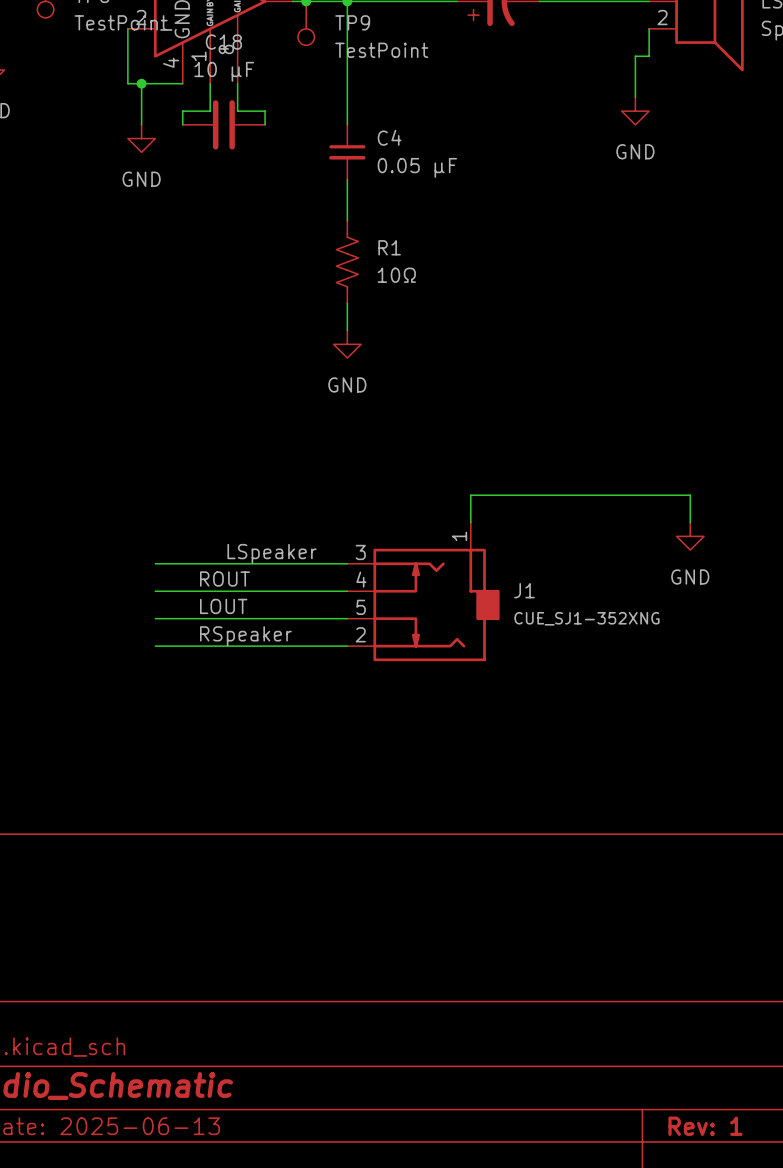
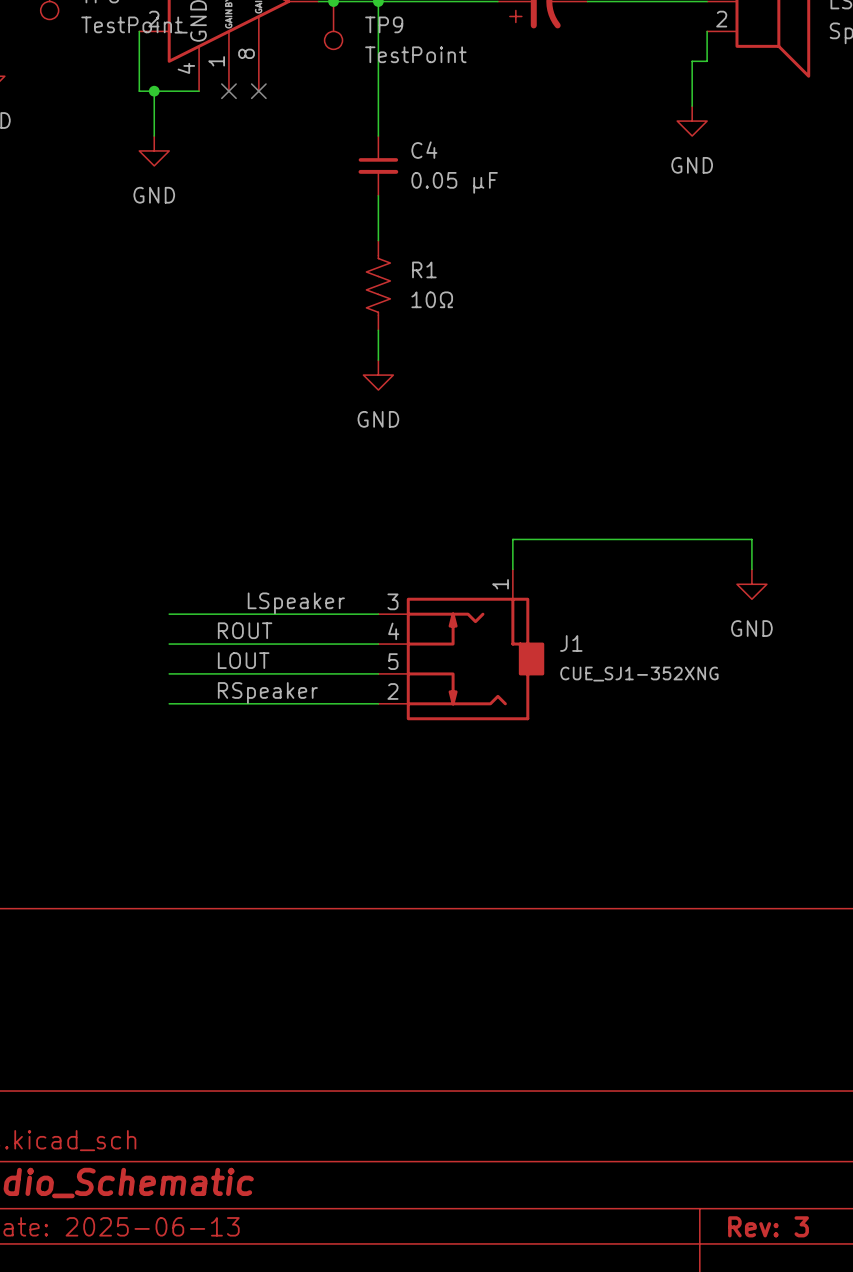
wire: (210, 83) (210, 111) (182, 111) (182, 124) -> none
no-connect mark: none -> (228, 91)
wire: (237, 83) (237, 111) (265, 111) (265, 124) -> none
no-connect mark: none -> (258, 91)
C18: 10 µF (223, 124) -> none
title block: Rev: 1 (705, 1126) -> Rev: 3 (768, 1226)

